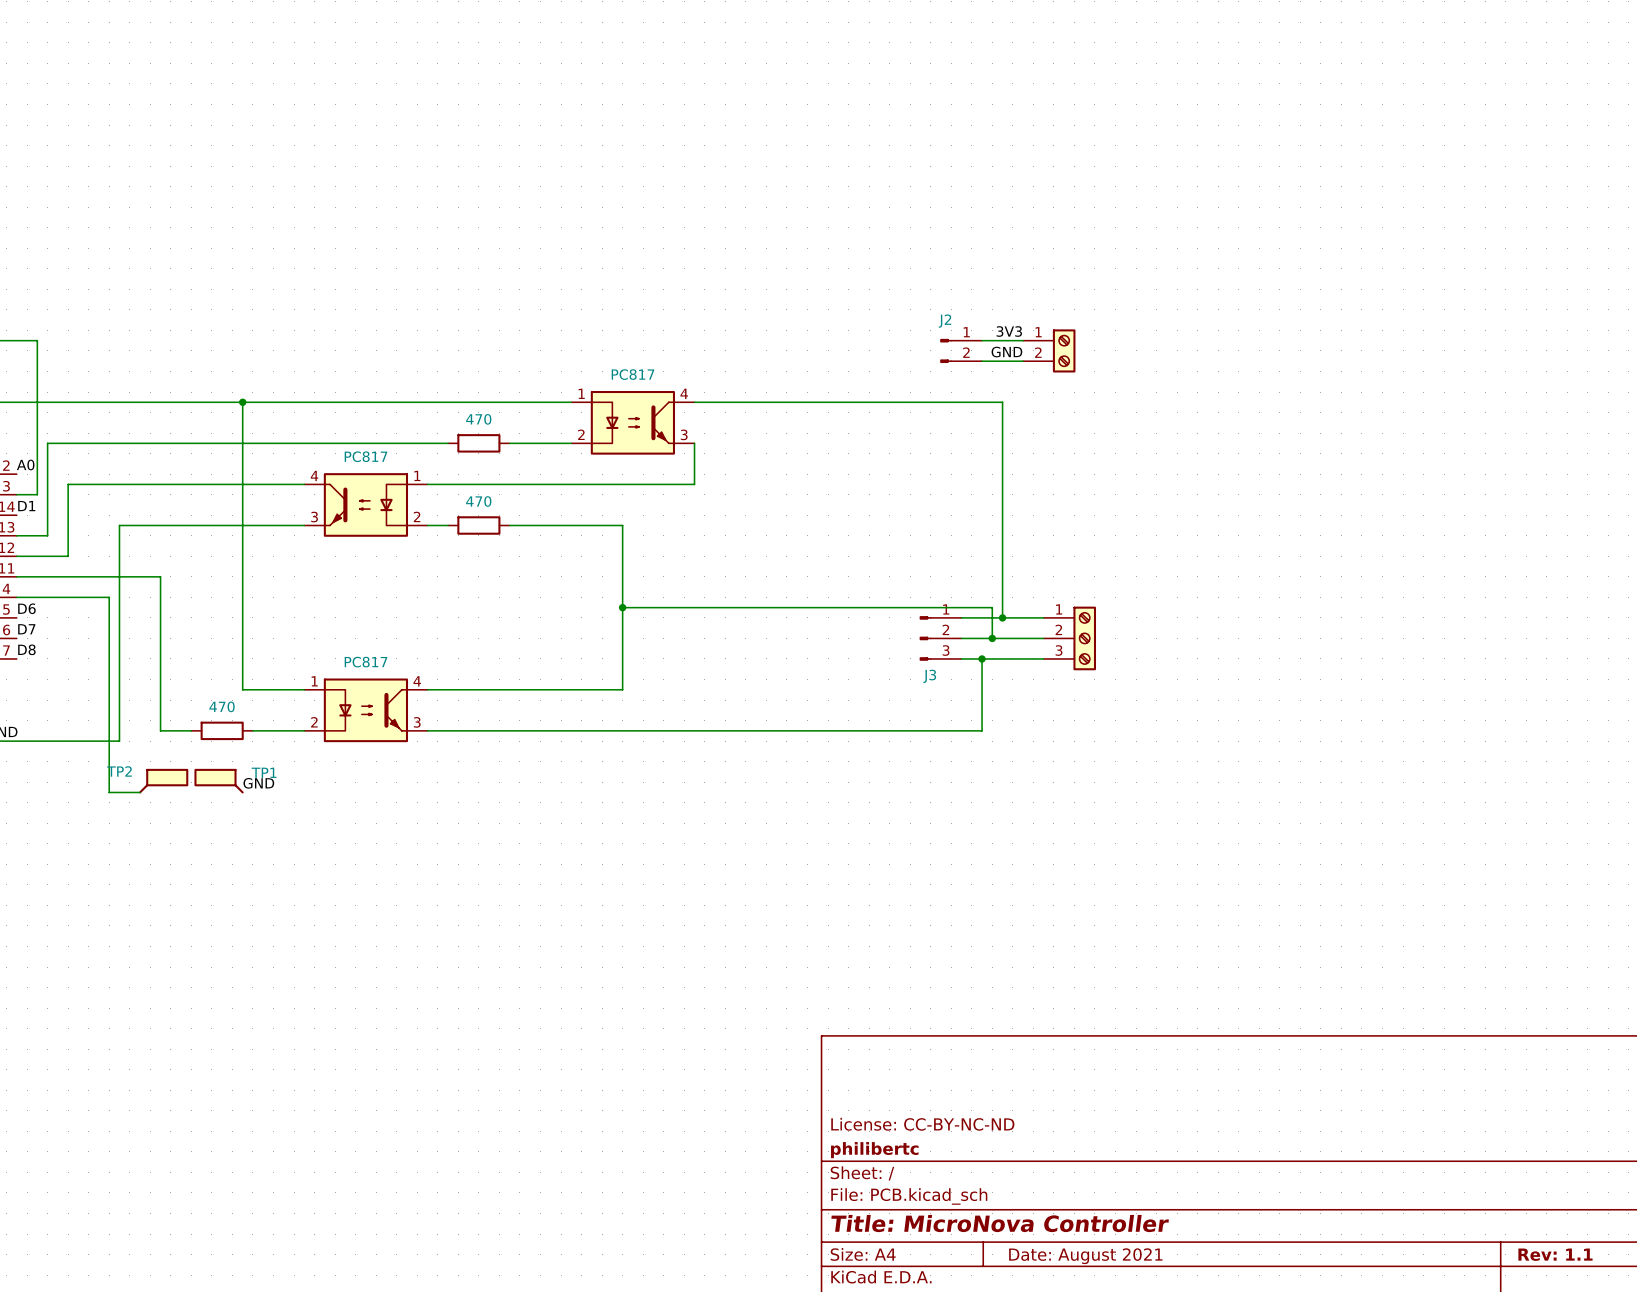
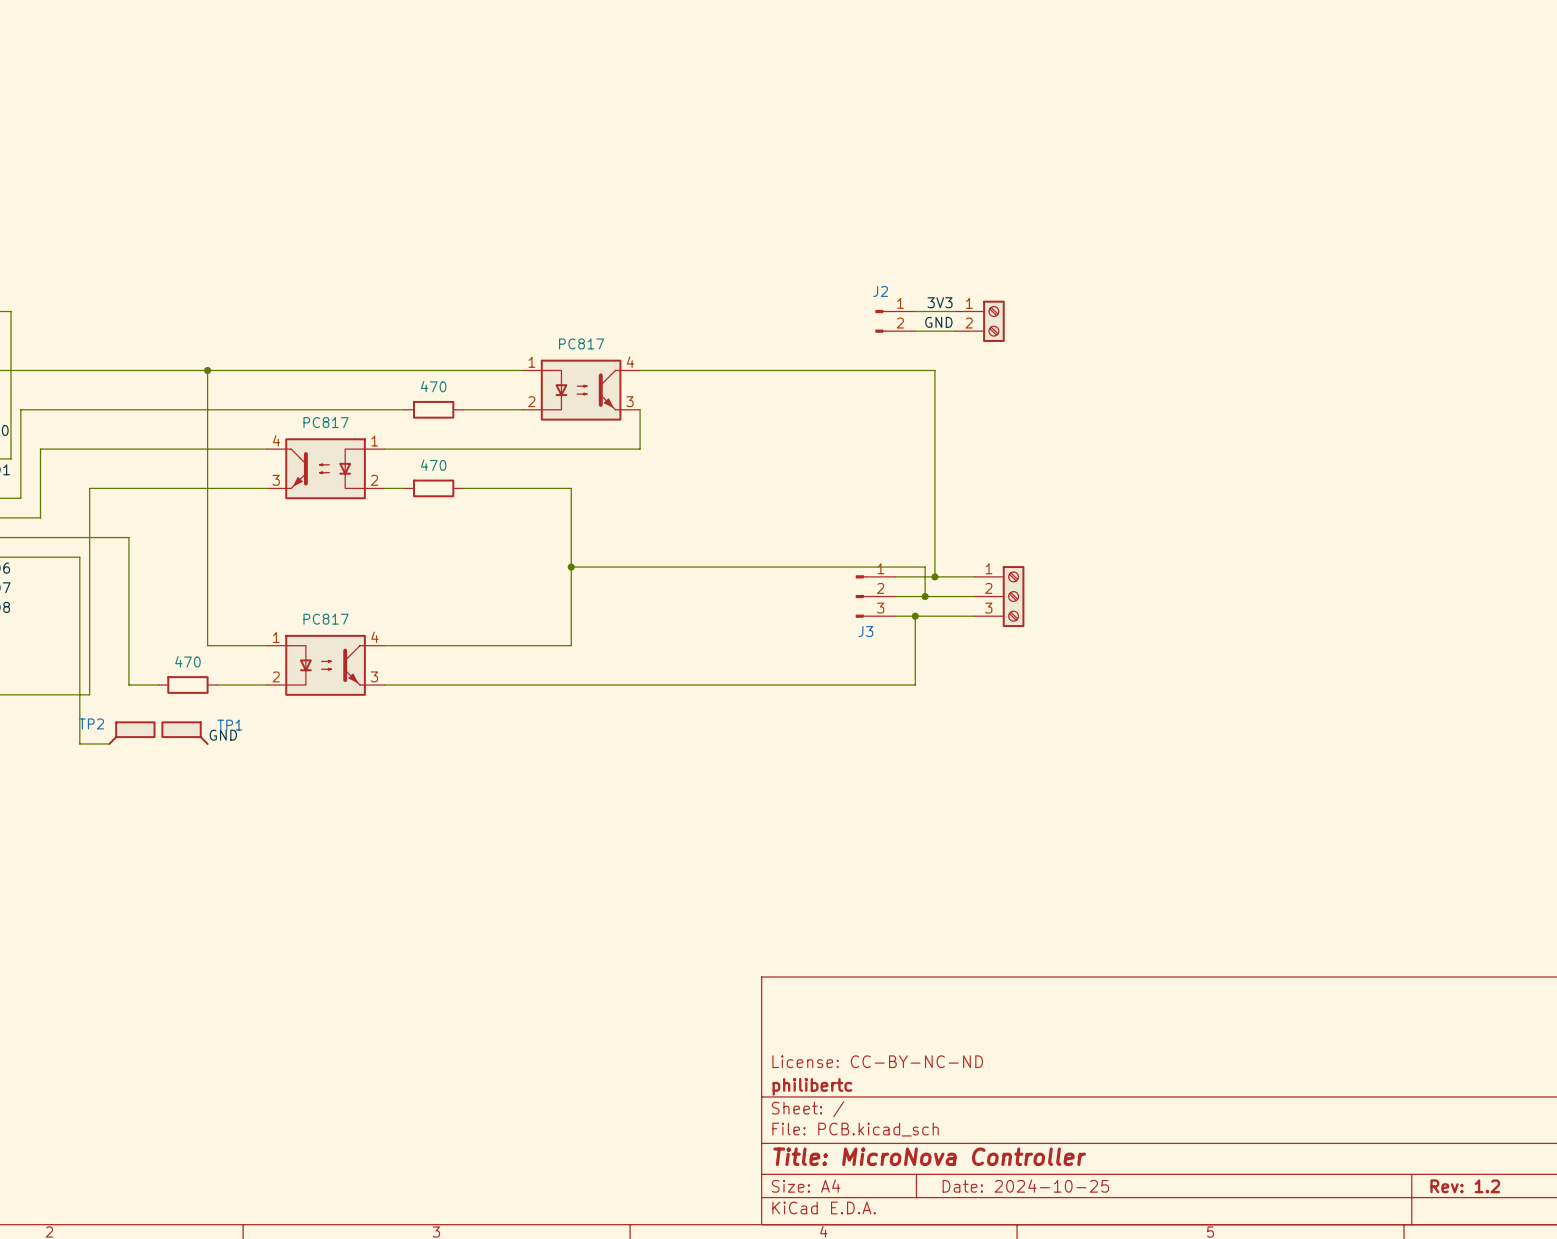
title block: Rev: 1.1 (1555, 1254) -> Rev: 1.2 (1465, 1186)
title block: Date: August 2021 (1085, 1256) -> Date: 2024-10-25 (1025, 1186)

